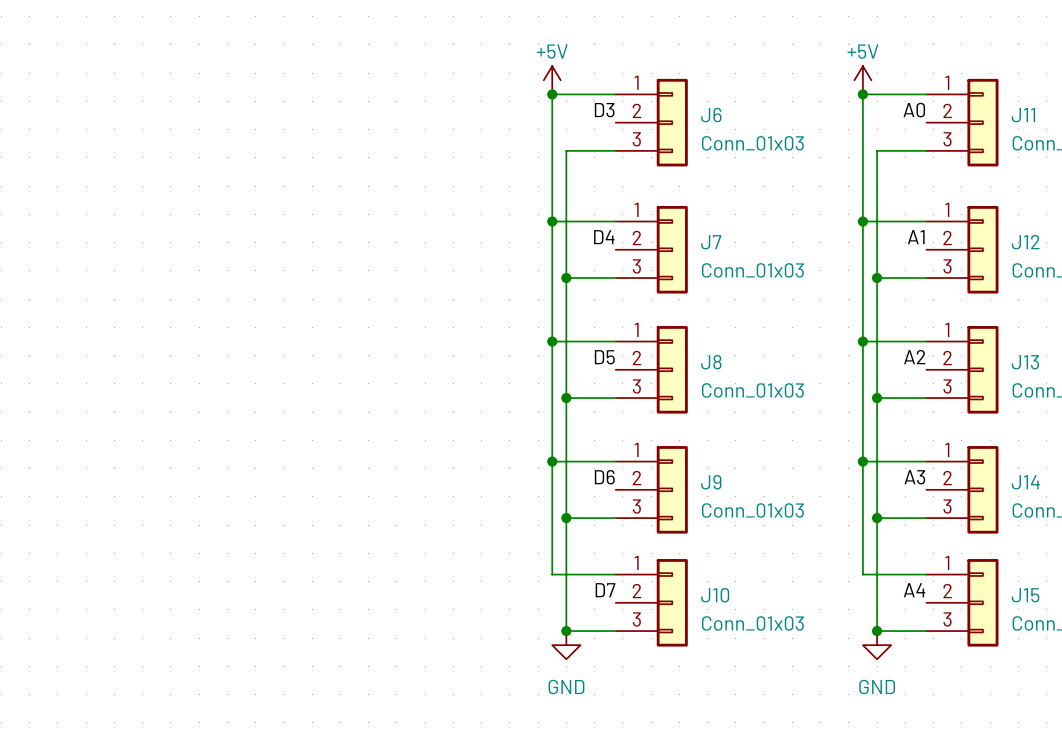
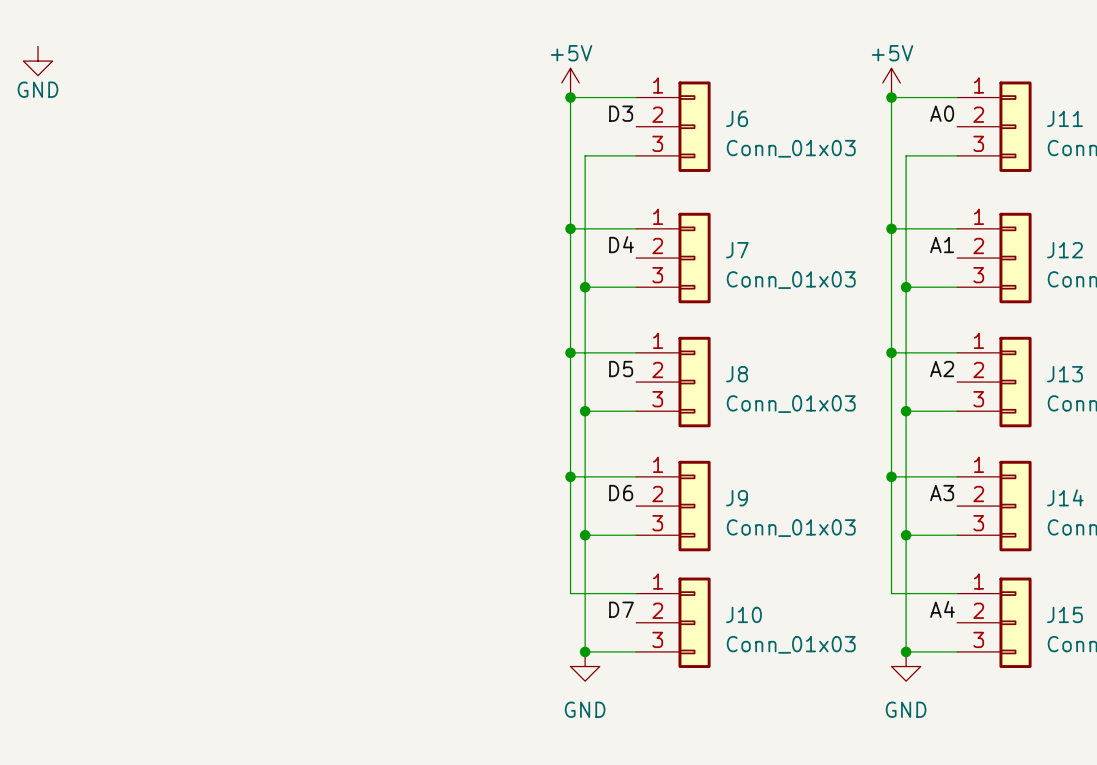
power symbol: none -> GND (38, 61)

